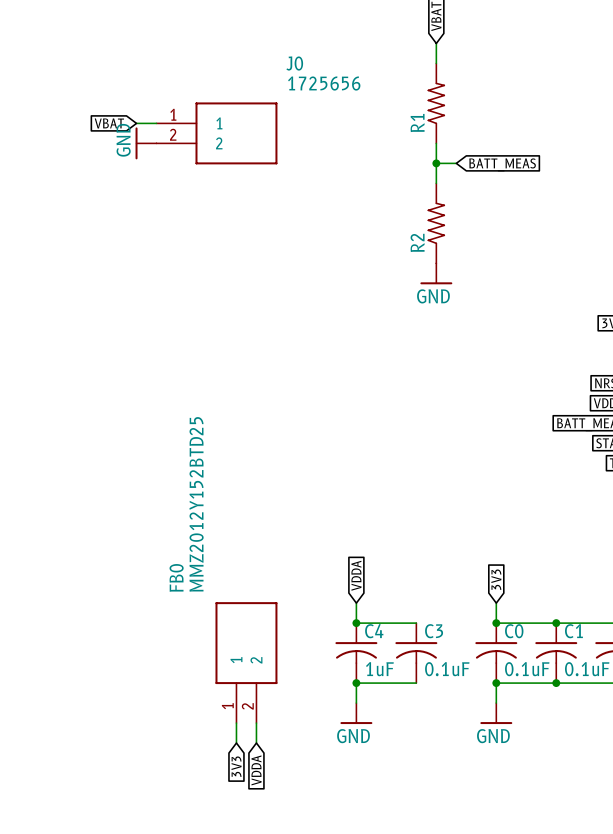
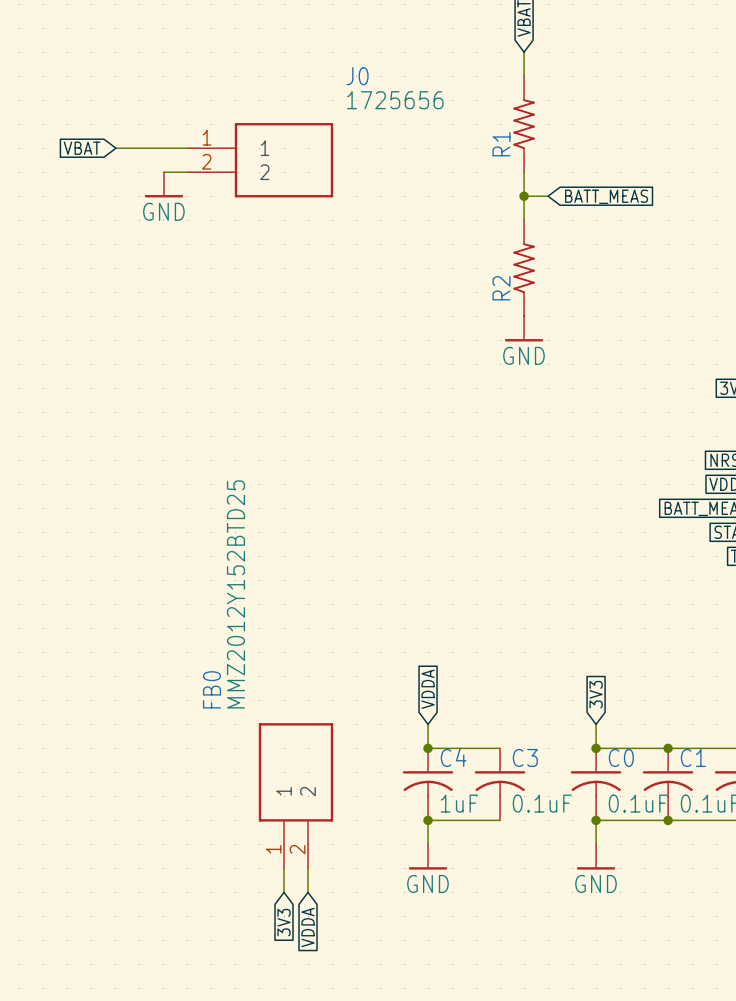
wire: none -> (115, 148) (163, 148)
global label position: VBAT (109, 123) -> VBAT (82, 148)
power symbol rotation: 0° (136, 143) -> 90° counterclockwise (163, 196)

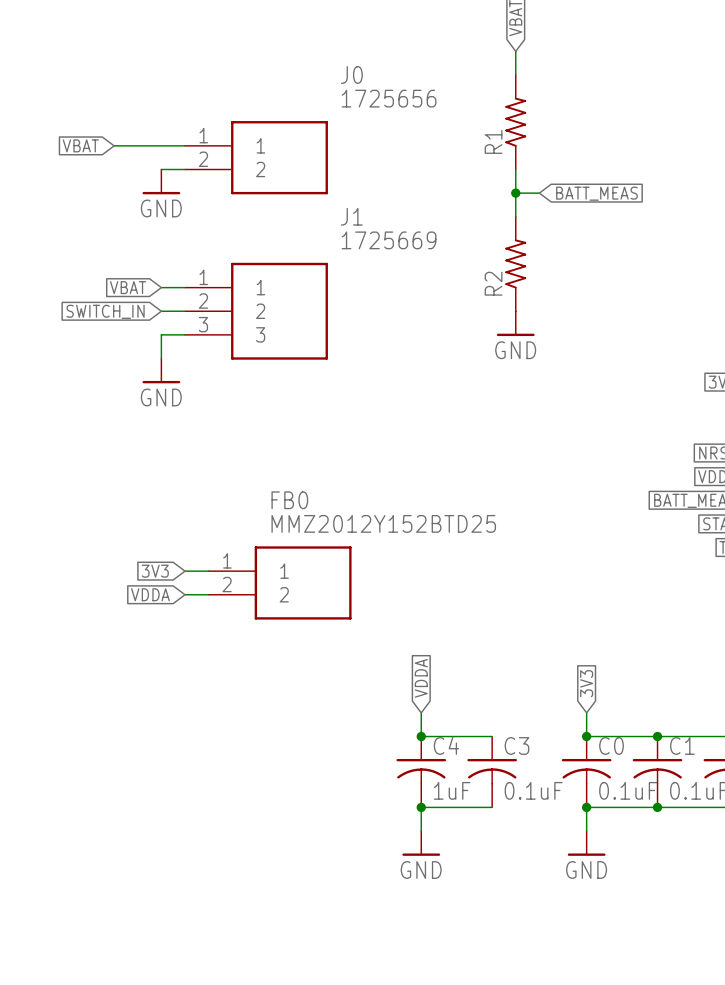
global label: none -> VBAT (128, 287)
wire: none -> (161, 287) (185, 287)
global label: none -> SWITCH_IN (105, 311)
wire: none -> (161, 311) (185, 311)
J1: none -> 1725669 (256, 311)
wire: none -> (185, 334) (161, 334) (161, 358)
power symbol: none -> GND (161, 370)
global label: none -> 3V3 (155, 571)
wire: none -> (185, 571) (208, 571)
FB0 value position: MMZ2012Y152BTD25 (235, 594) -> MMZ2012Y152BTD25 (383, 523)
global label: none -> VDDA (150, 594)
wire: none -> (185, 594) (208, 594)
FB0 name position: FB0 (211, 689) -> FB0 (289, 500)
FB0 rotation: 0° (296, 772) -> 90° clockwise (303, 582)
FB0 position: (296, 795) -> (280, 582)
wire: (284, 868) (284, 892) -> none
wire: (308, 868) (308, 892) -> none
global label: 3V3 (284, 922) -> none
global label: VDDA (308, 927) -> none

